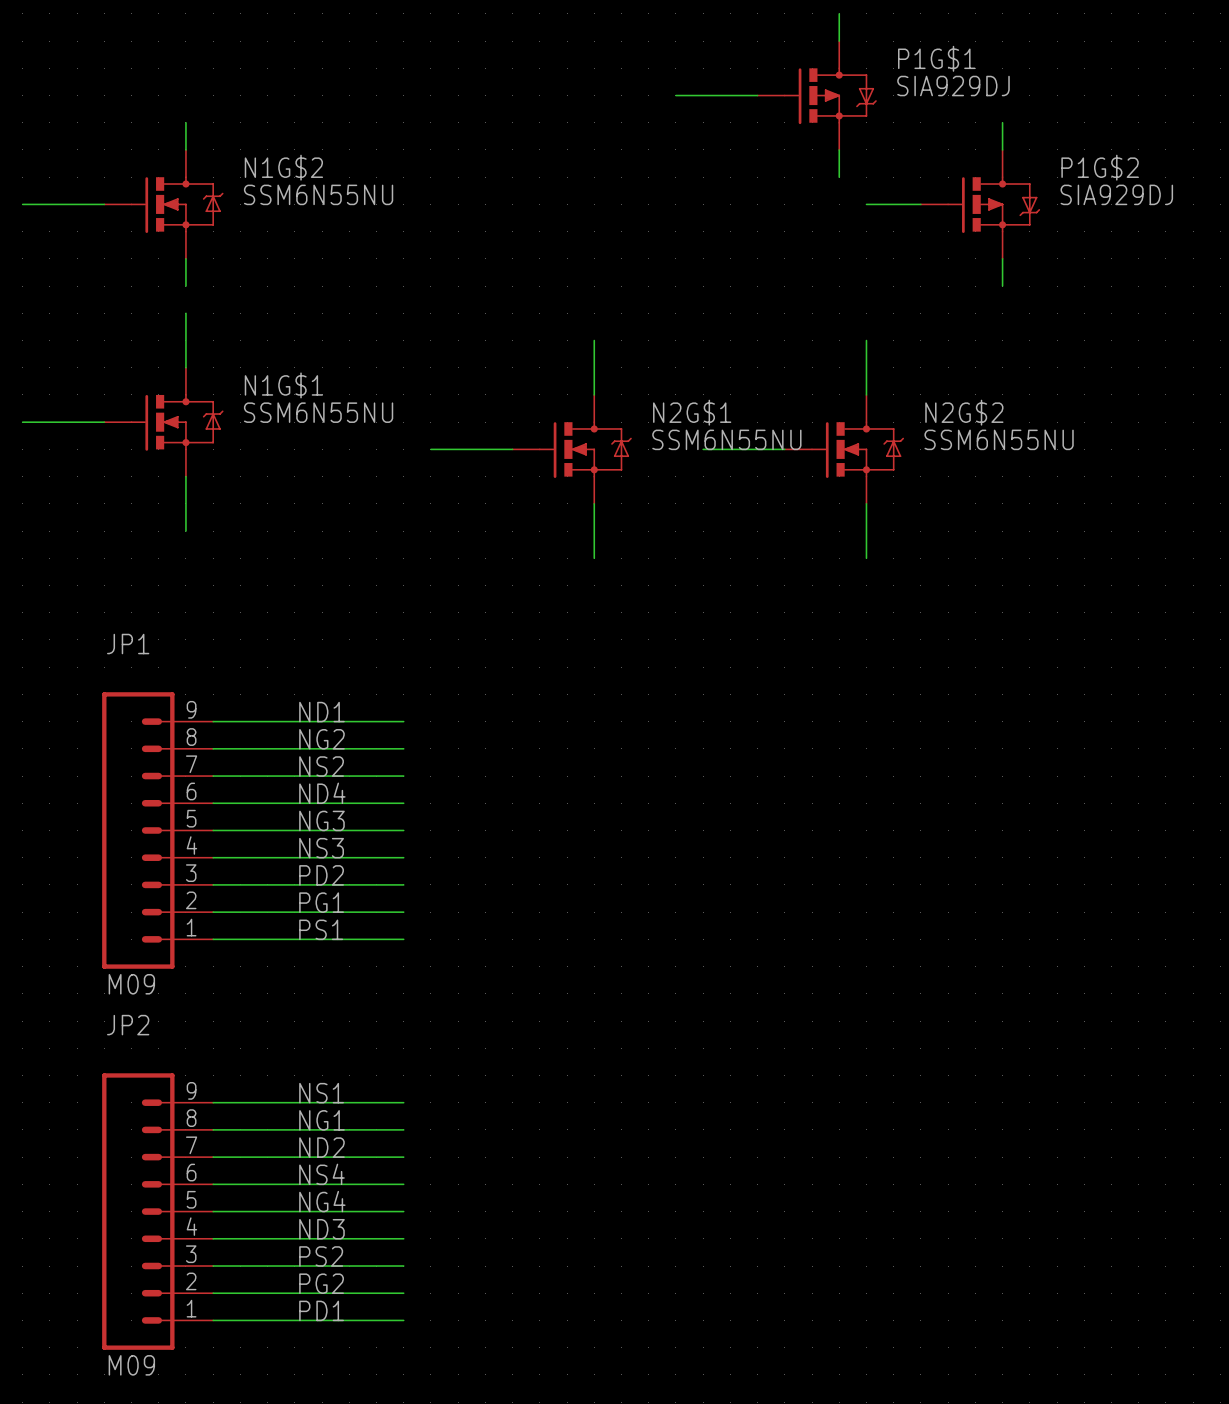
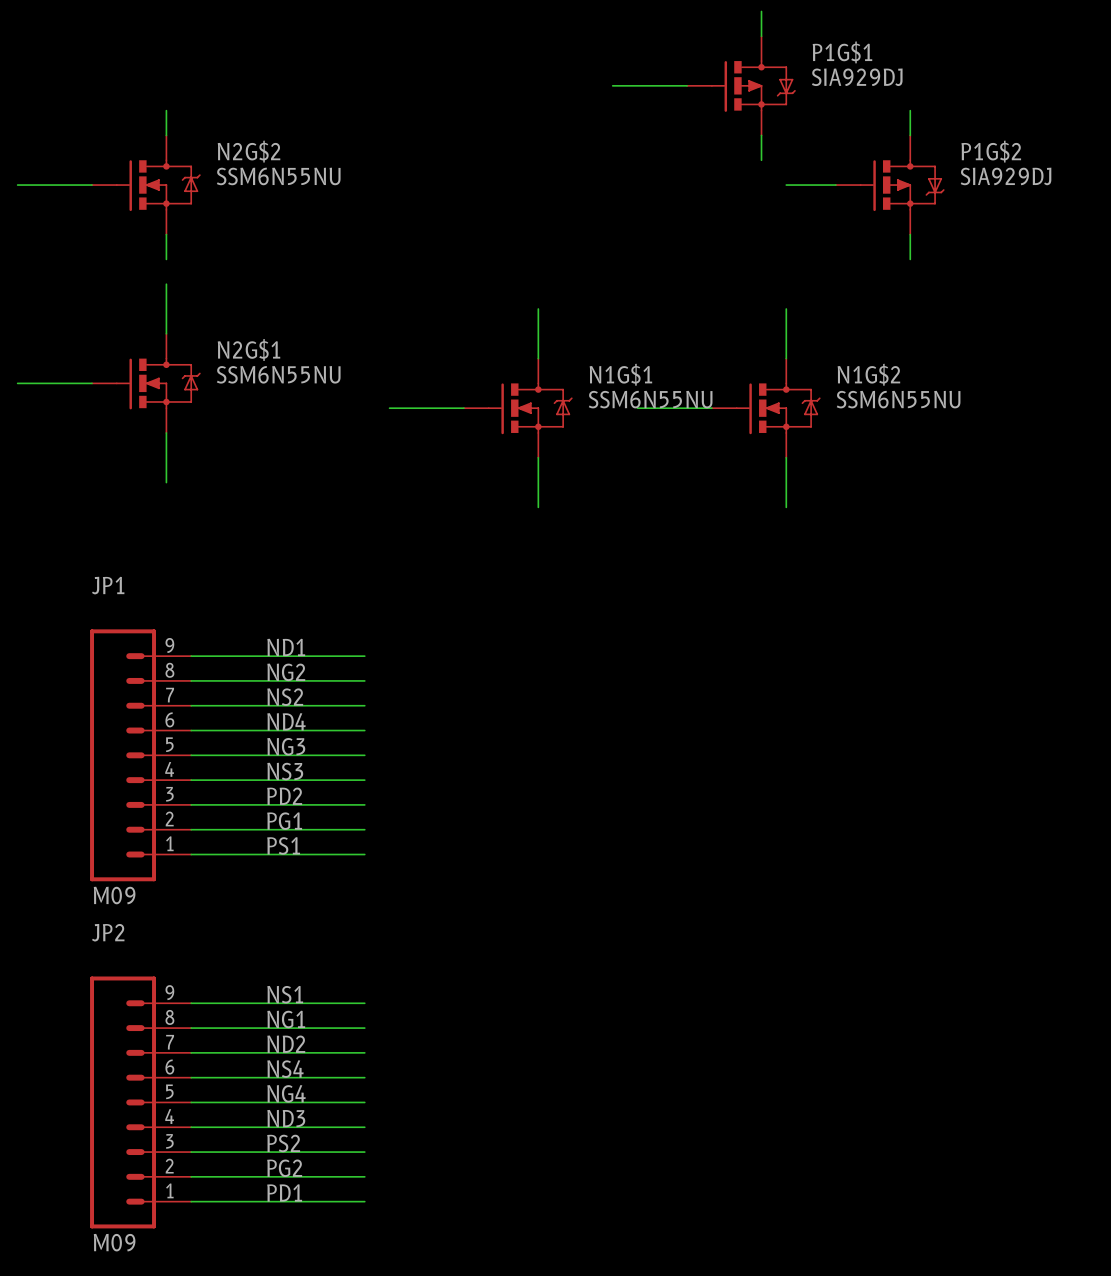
N1G$2 name: N1G$2 (283, 167) -> N2G$2 (249, 151)
N1G$1 name: N1G$1 (283, 385) -> N2G$1 (248, 349)
N2G$1 name: N2G$1 (692, 412) -> N1G$1 (620, 374)
N2G$2 name: N2G$2 (964, 412) -> N1G$2 (868, 374)

